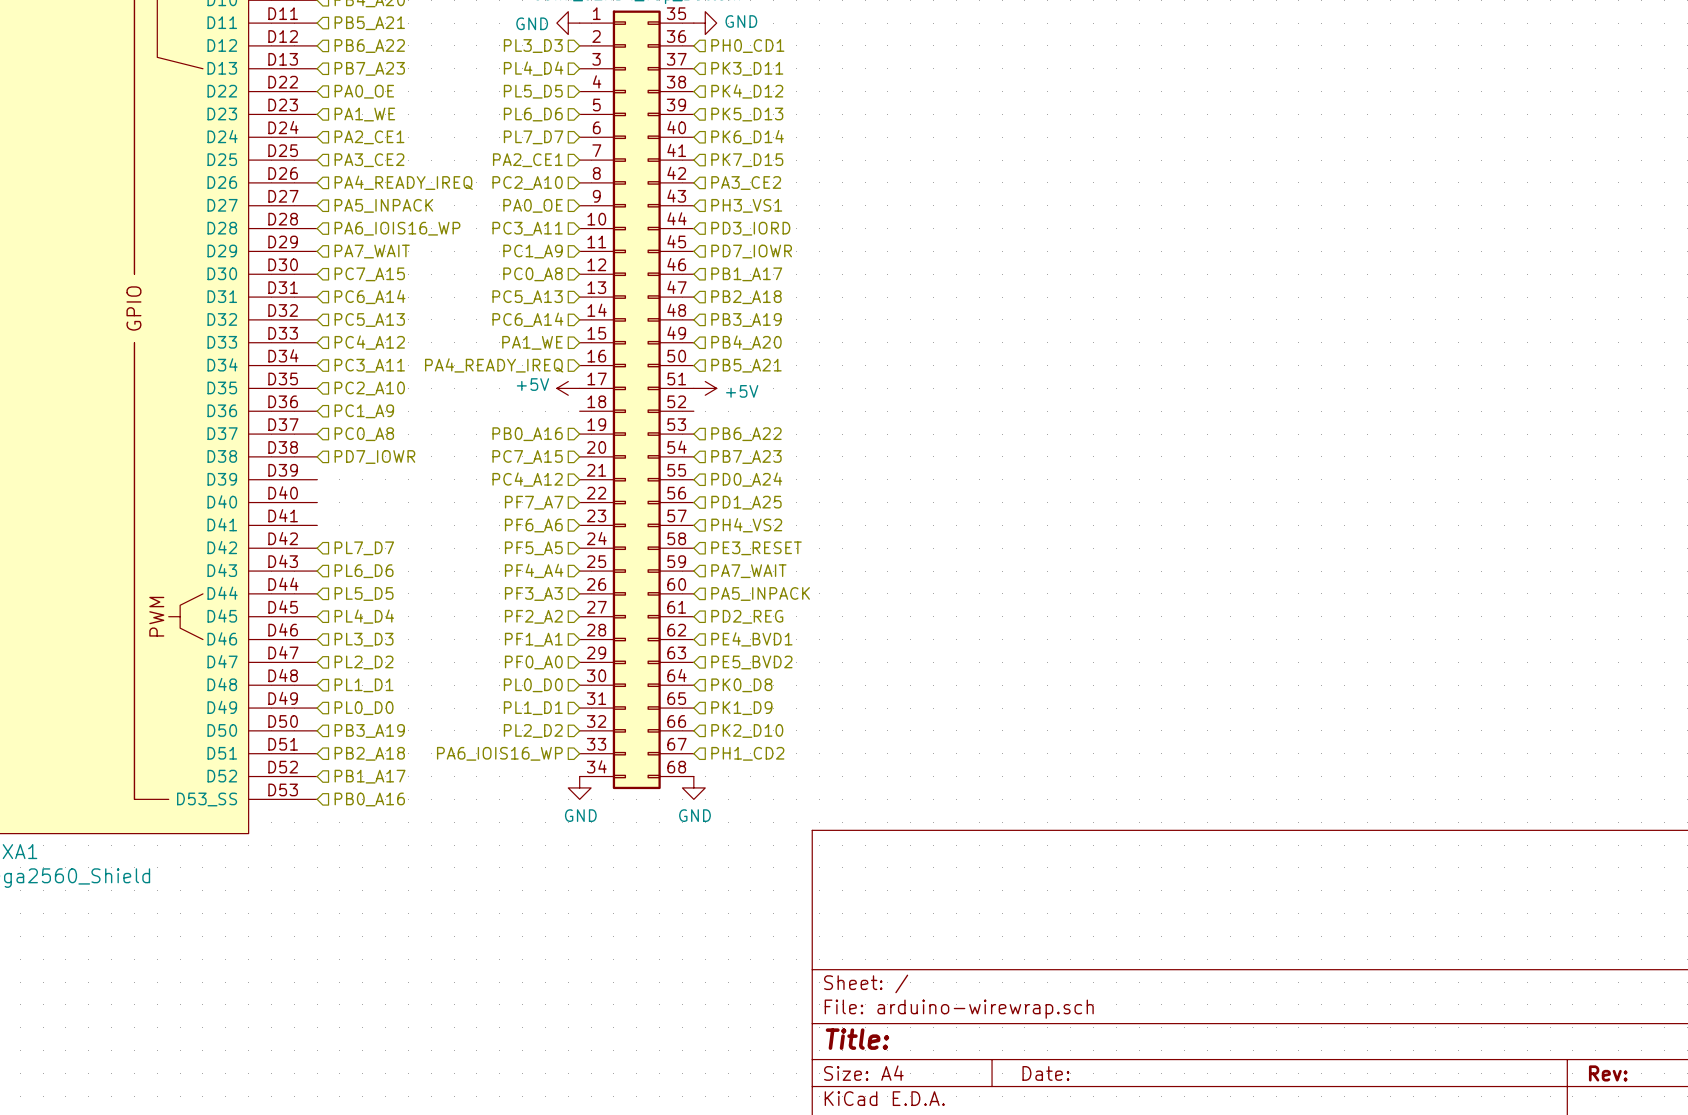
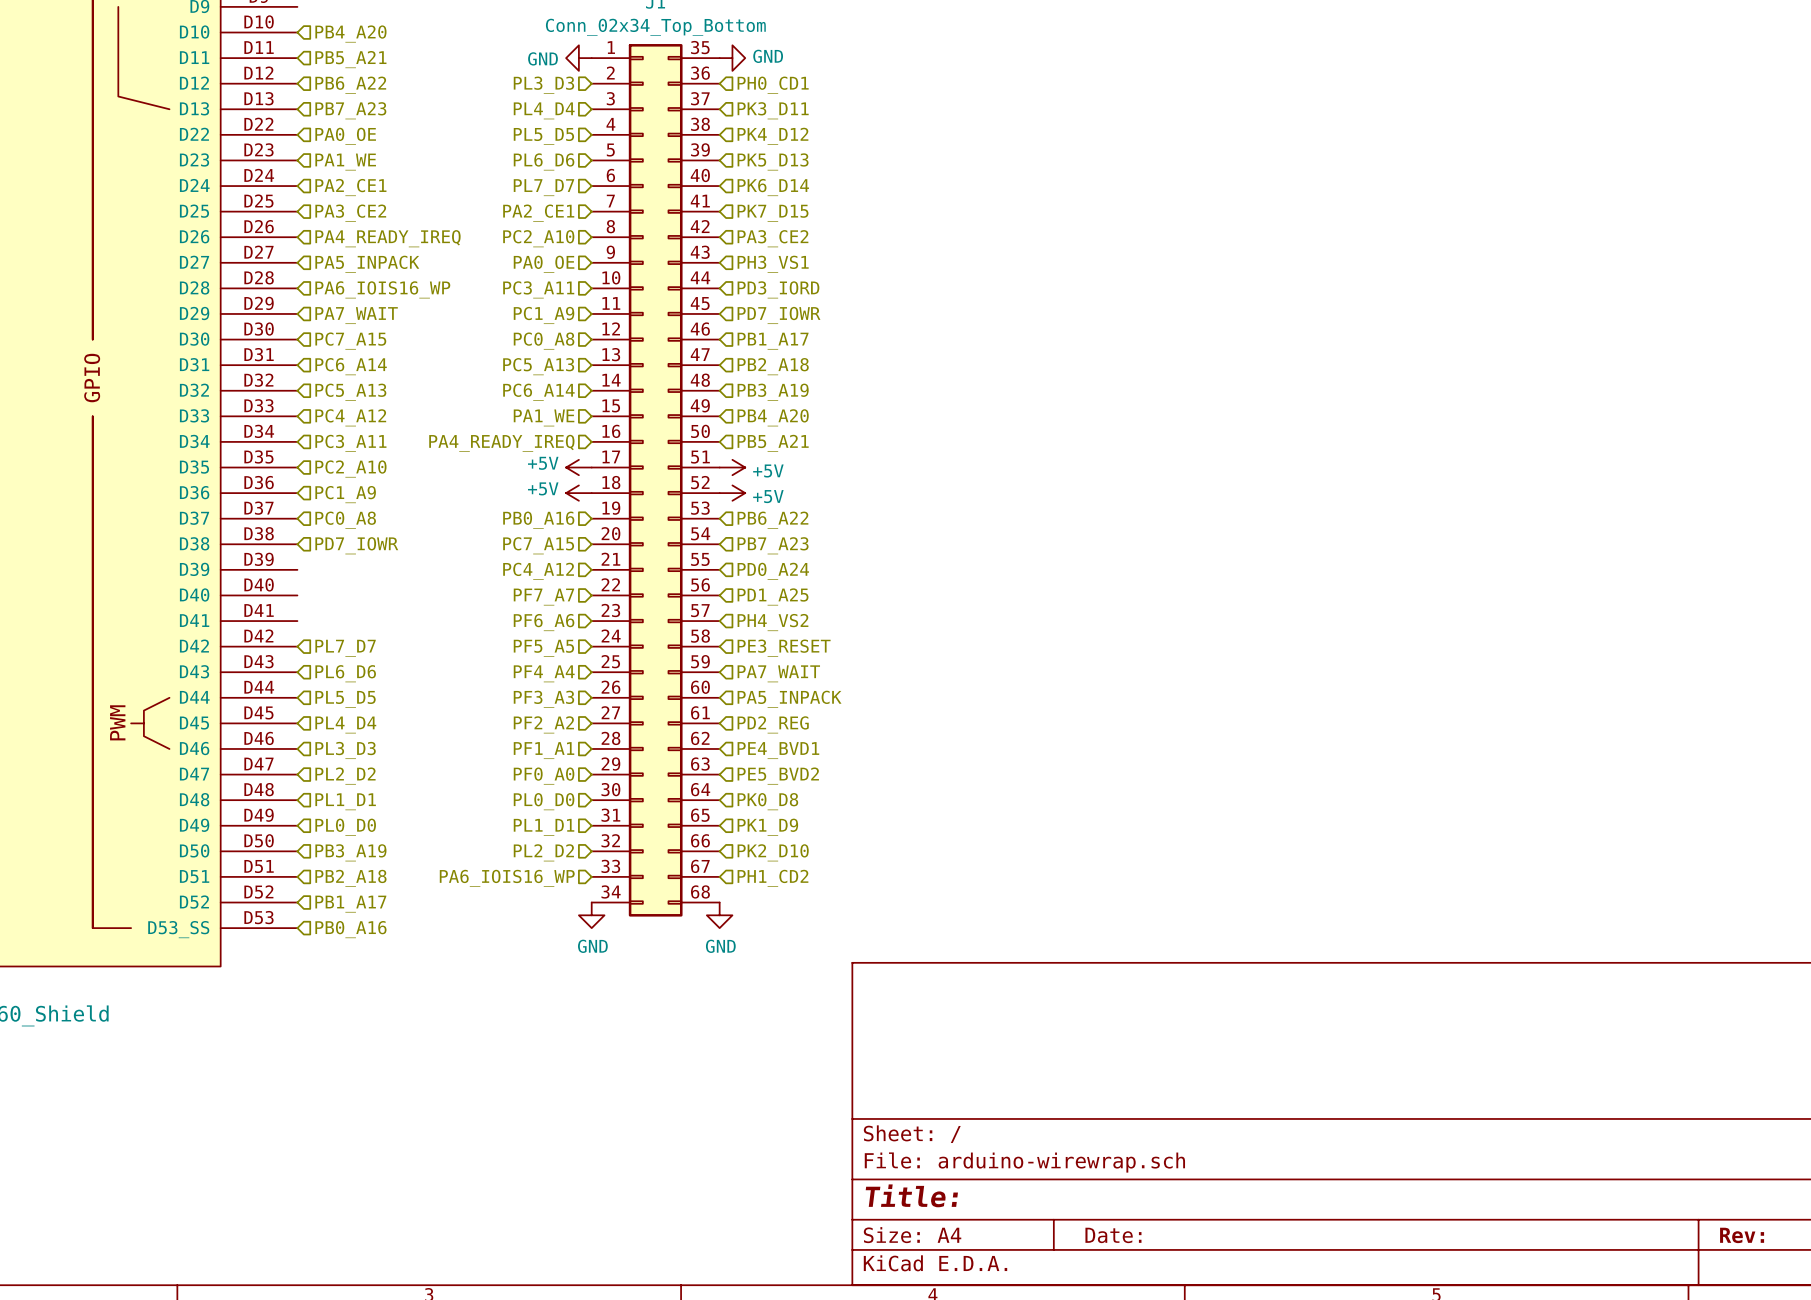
power symbol: none -> +5V (578, 493)
power symbol: none -> +5V (732, 493)

